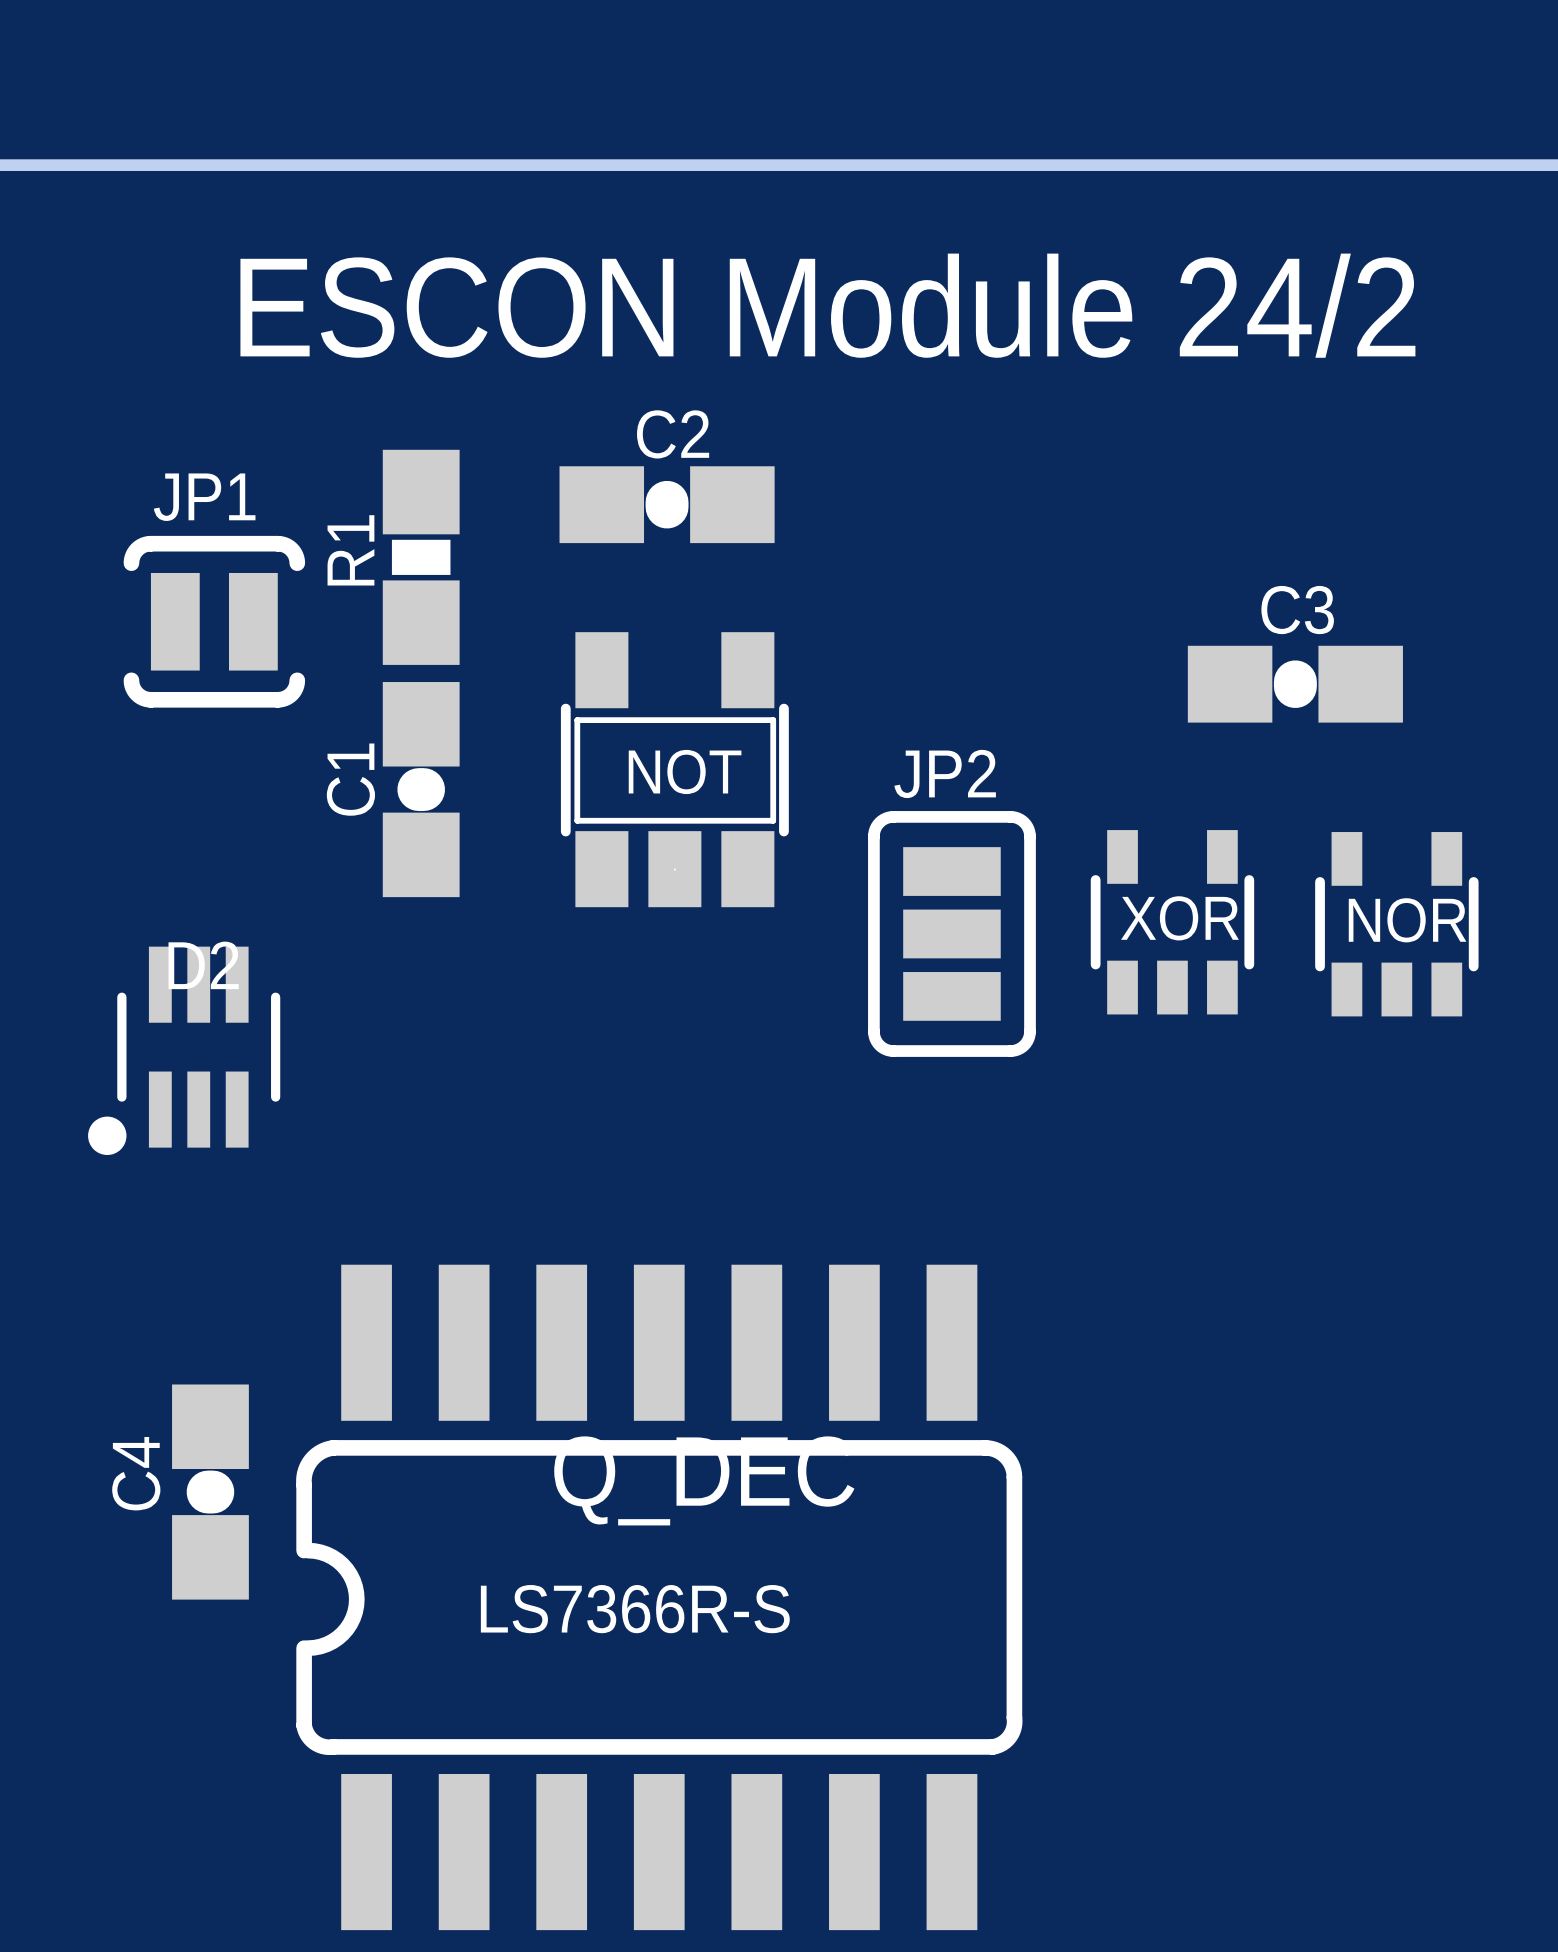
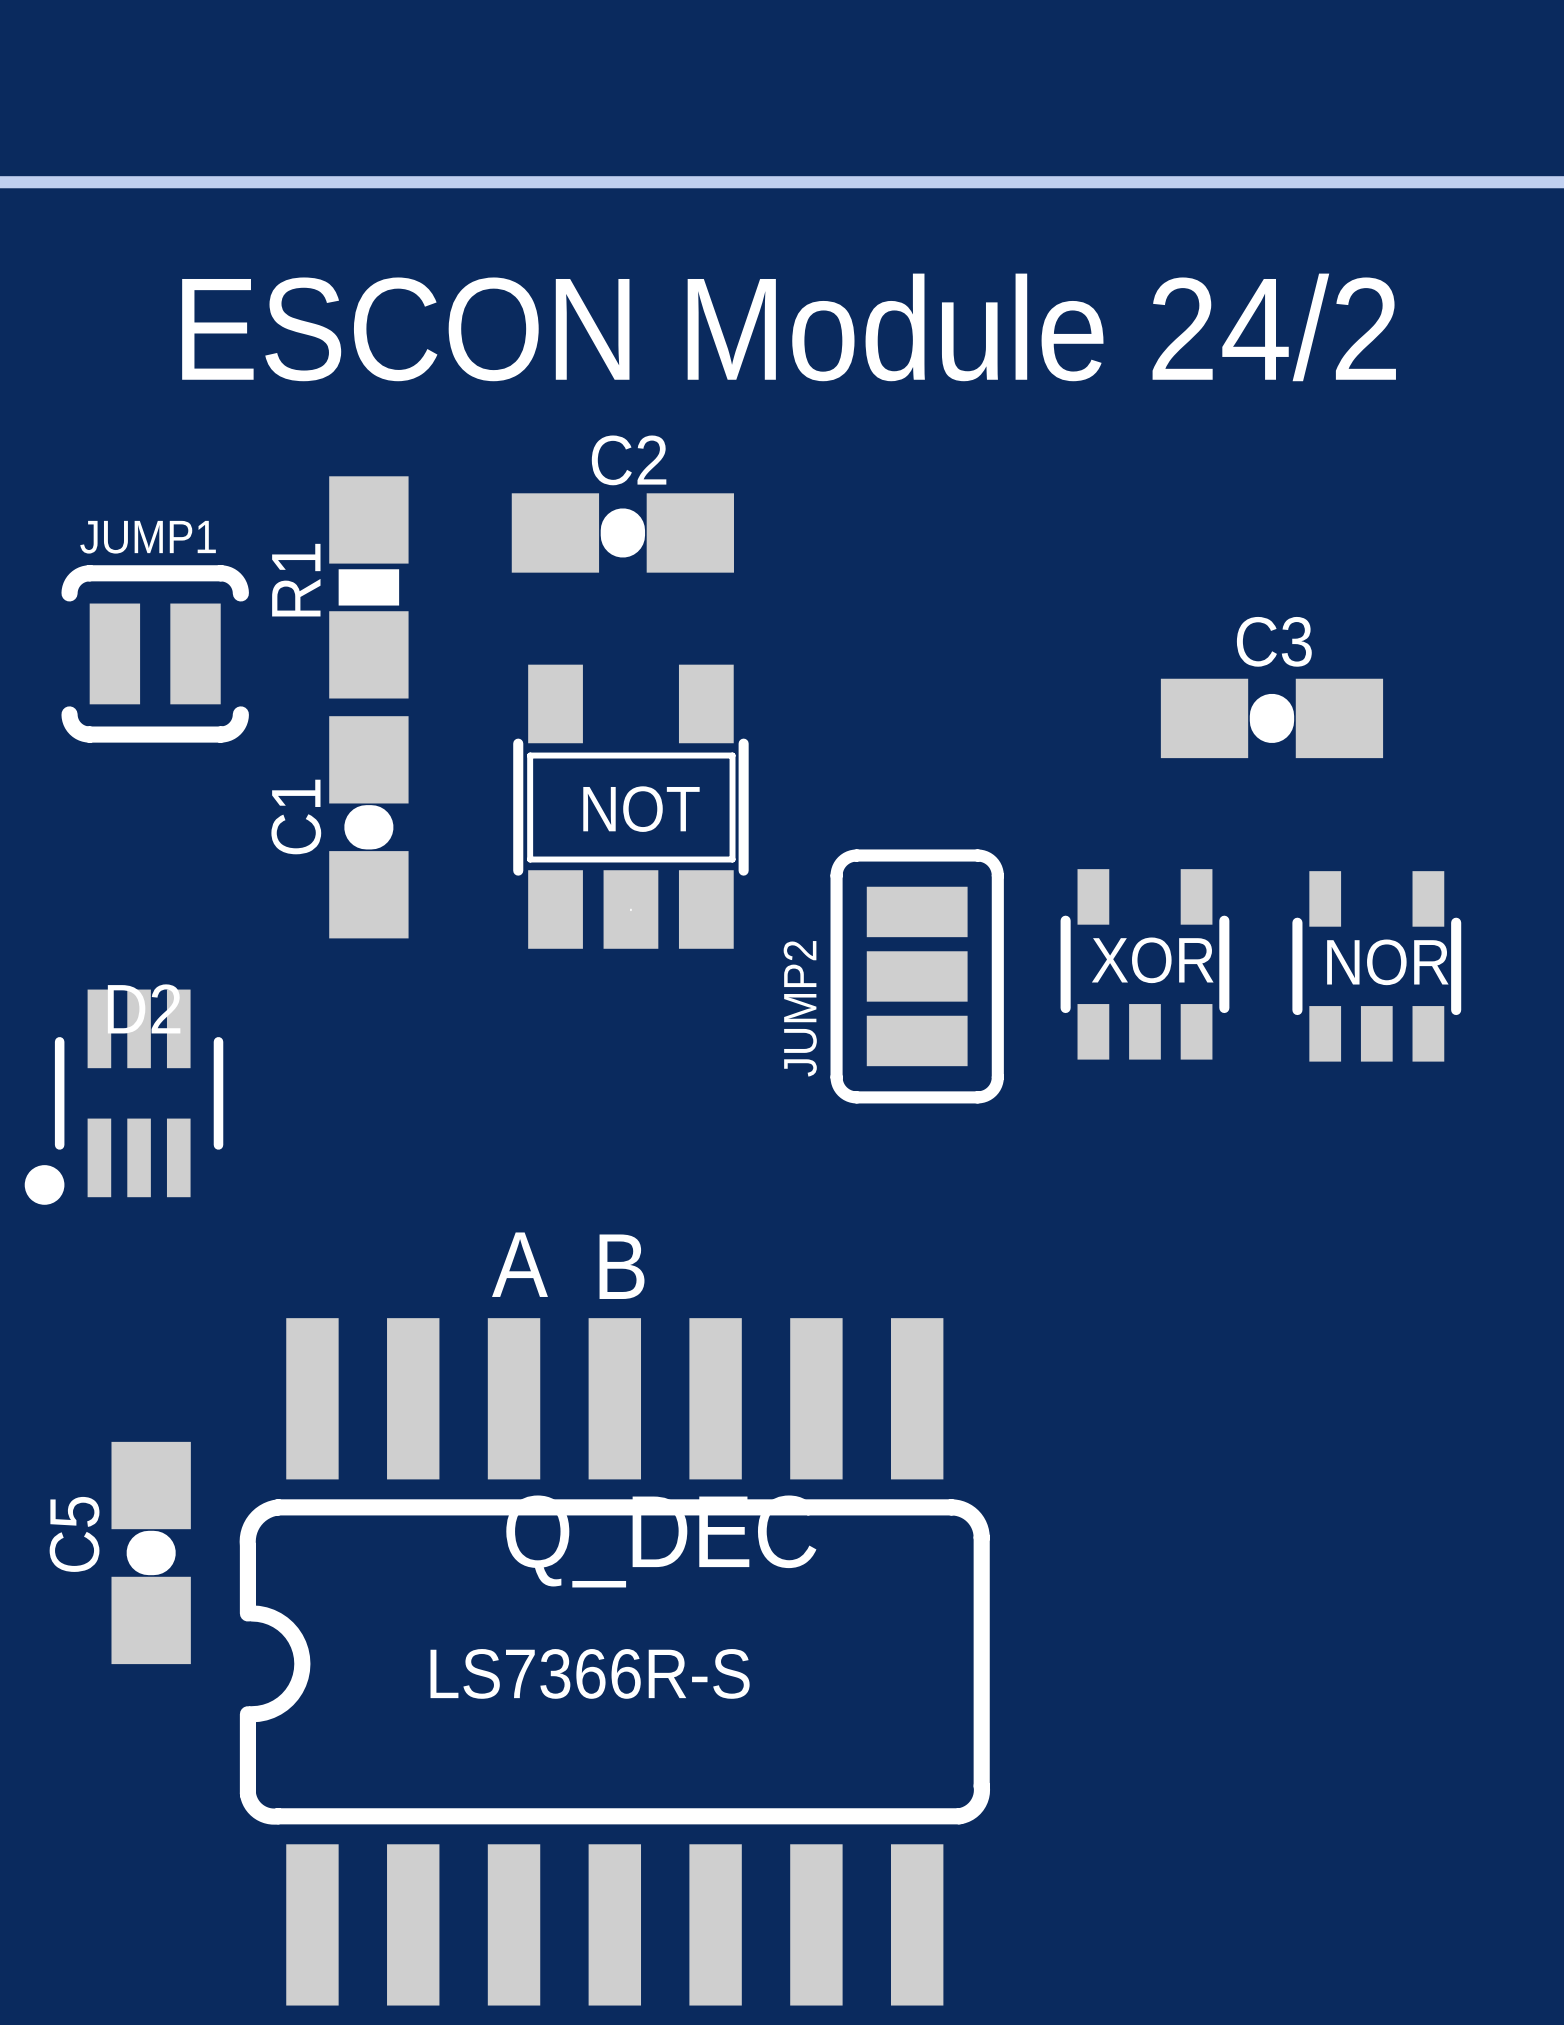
JP1 name: JP1 (204, 497) -> JUMP1 (148, 537)
JP2 name: JP2 (945, 773) -> JUMP2 (800, 1008)
text: none -> A (519, 1264)
text: none -> B (622, 1266)
C4 name: C4 (136, 1473) -> C5 (74, 1534)

